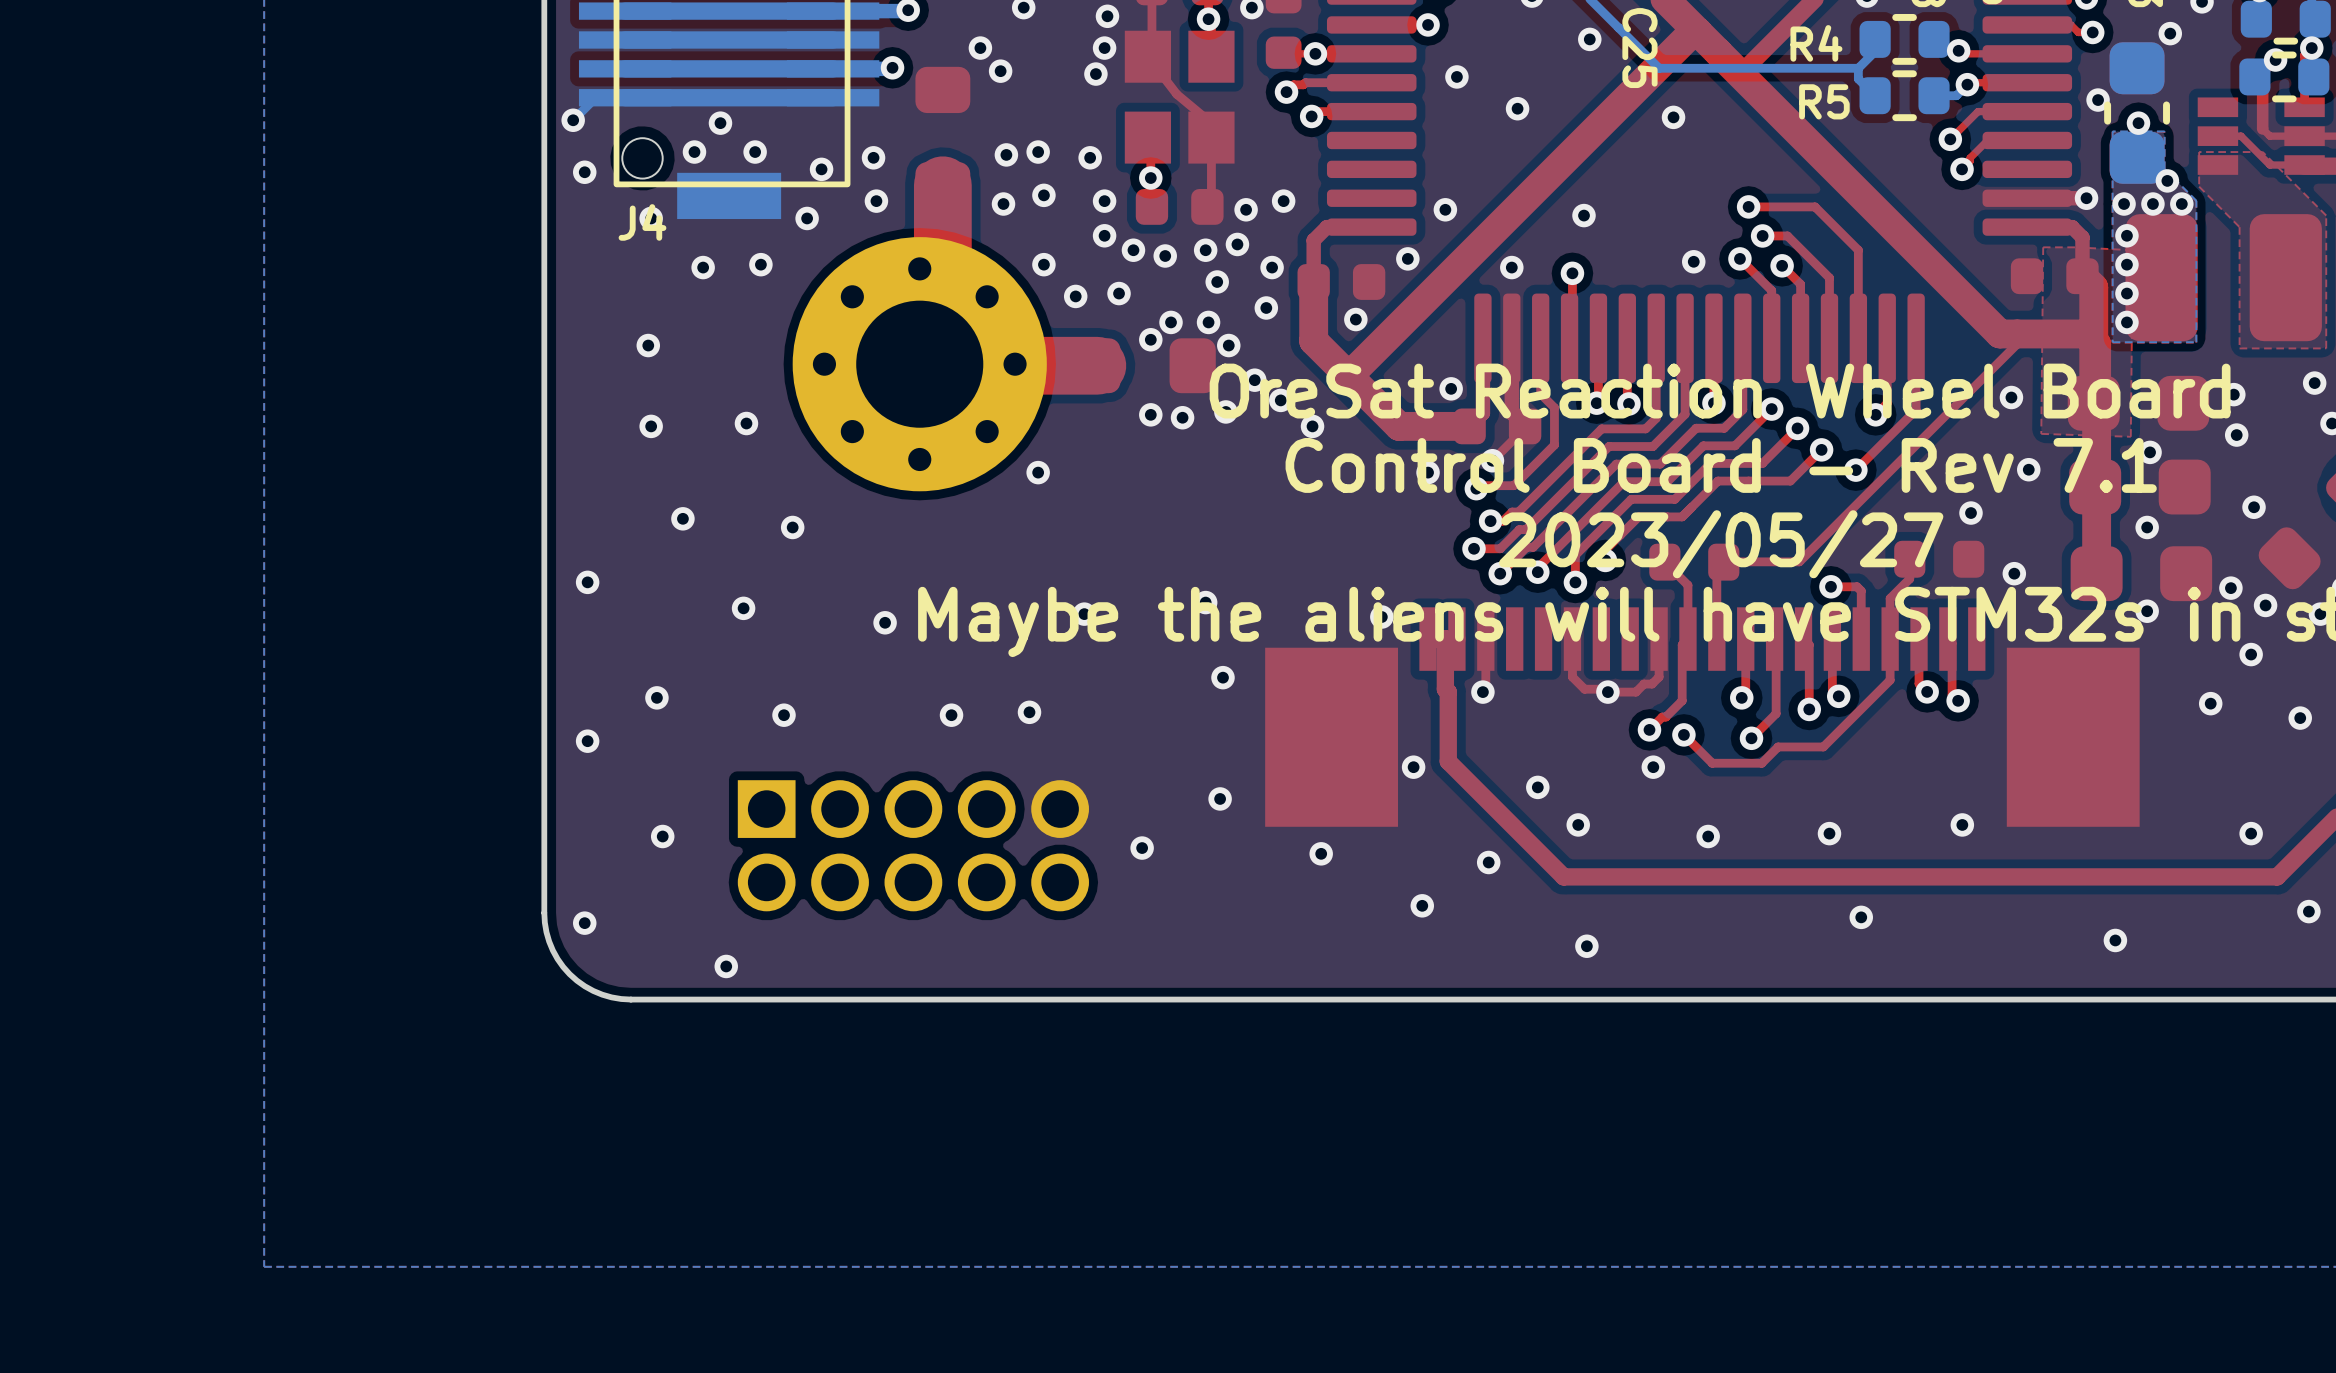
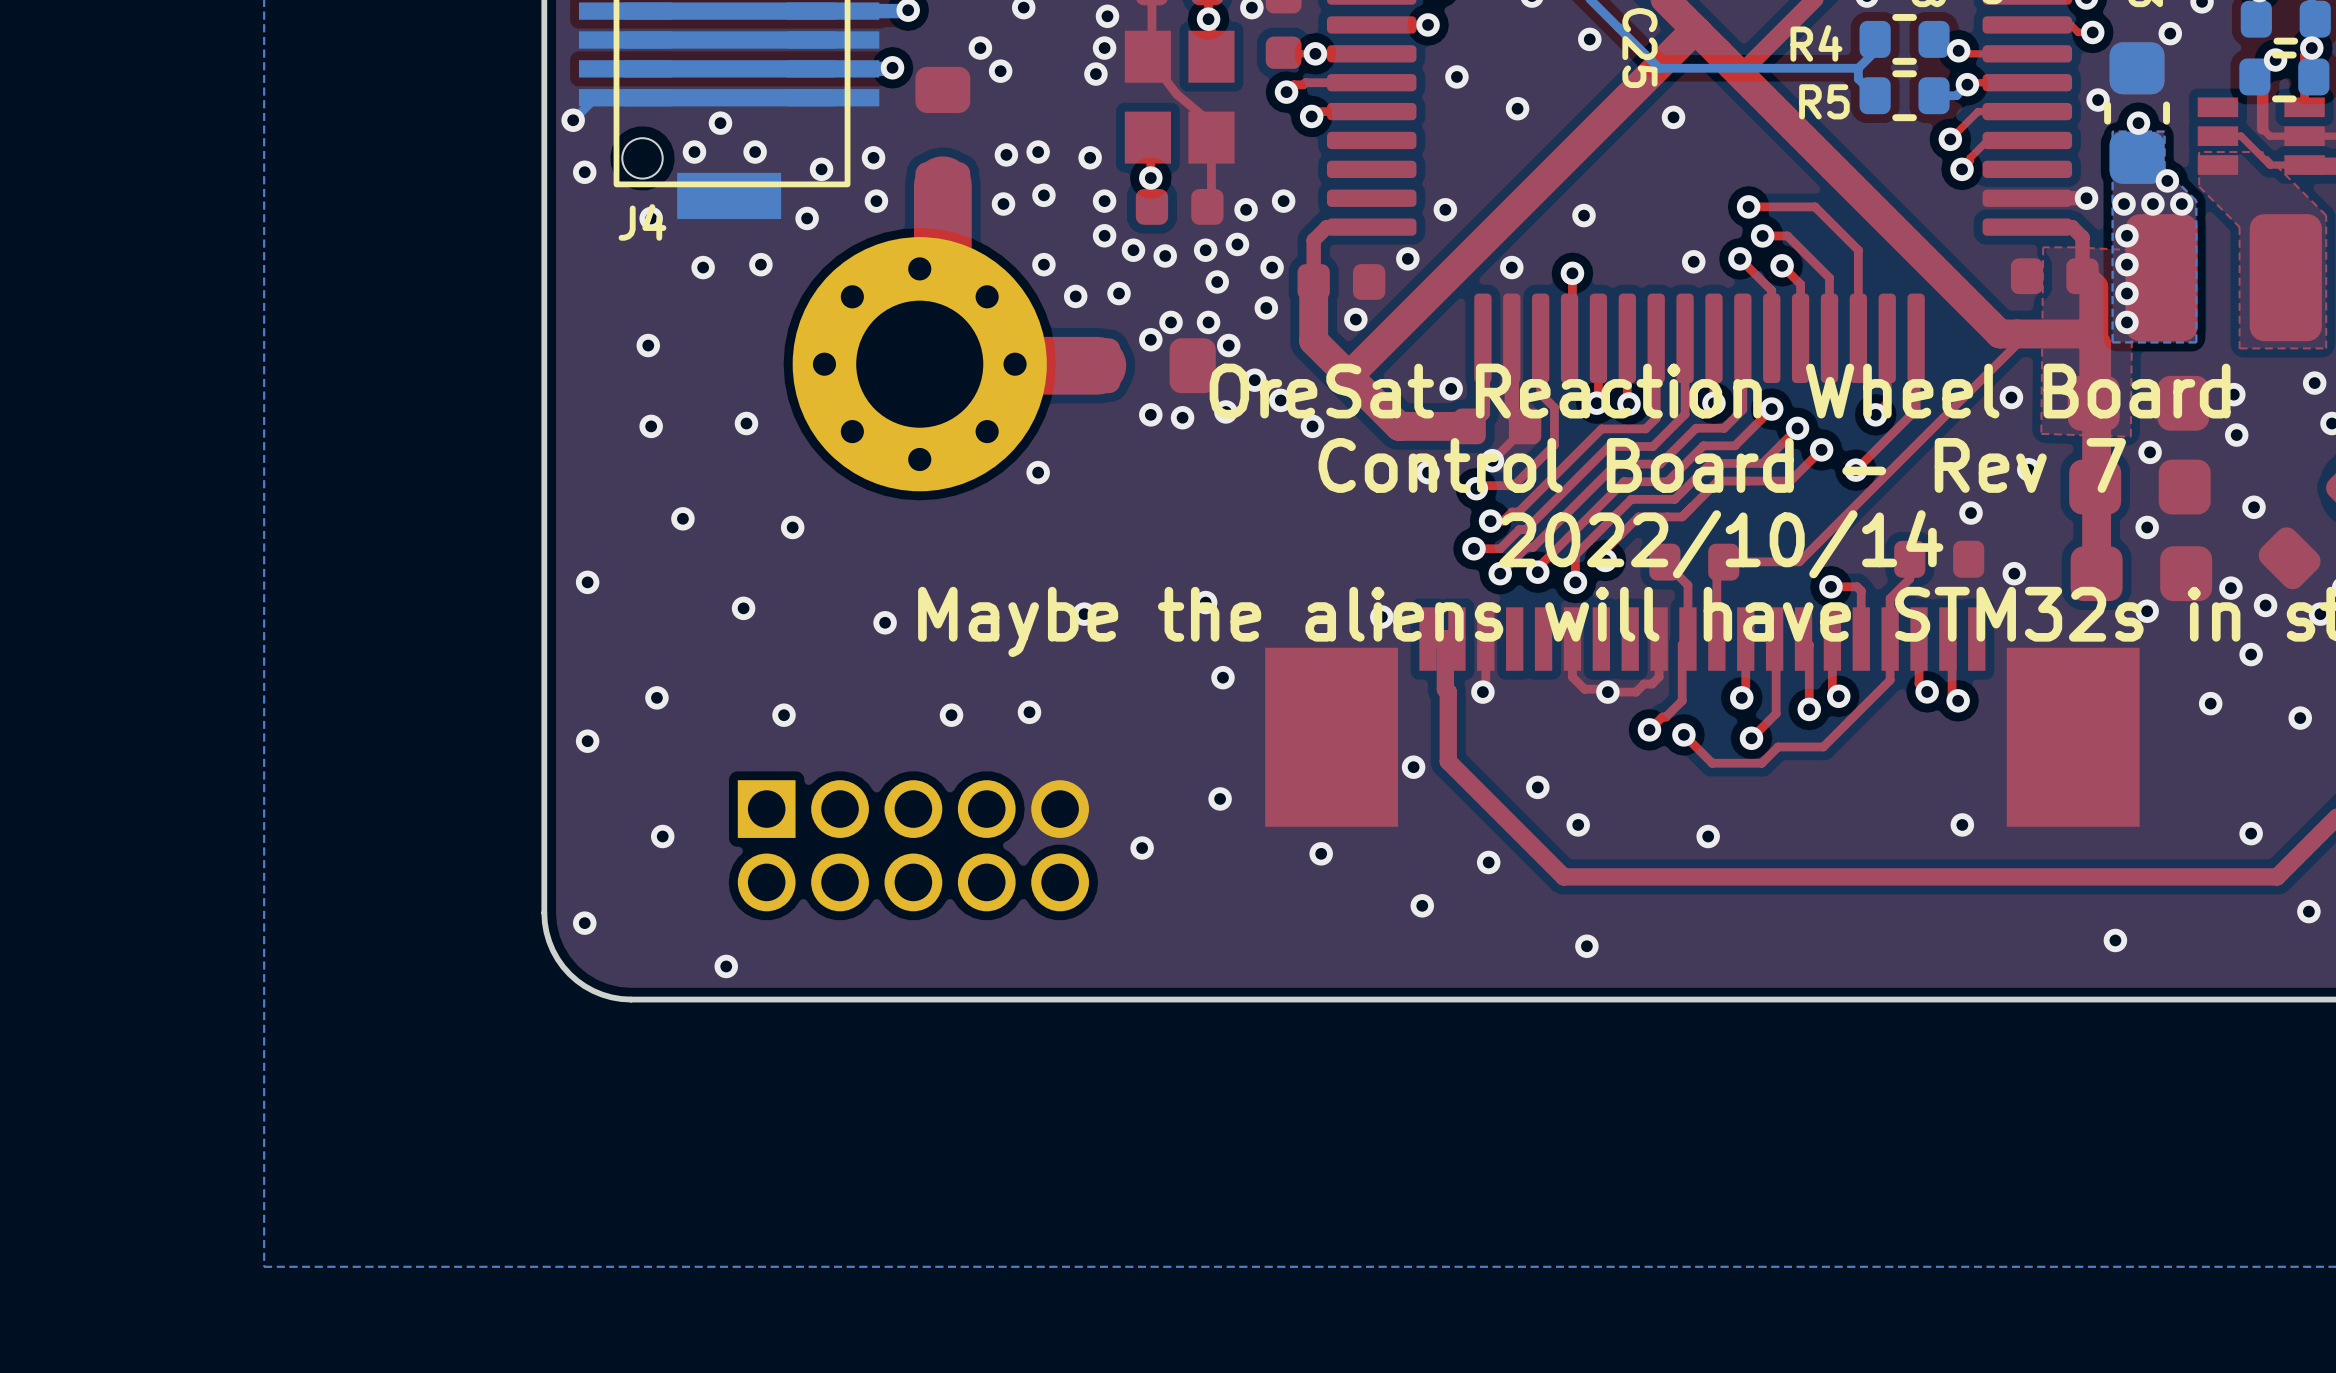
text: Control Board - Rev 7.1 (1721, 465) -> Control Board - Rev 7 (1722, 465)
text: 2023/05/27 (1721, 544) -> 2022/10/14 (1721, 544)
via: (1653, 767) -> none
via: (1829, 833) -> none
via: (1861, 917) -> none

